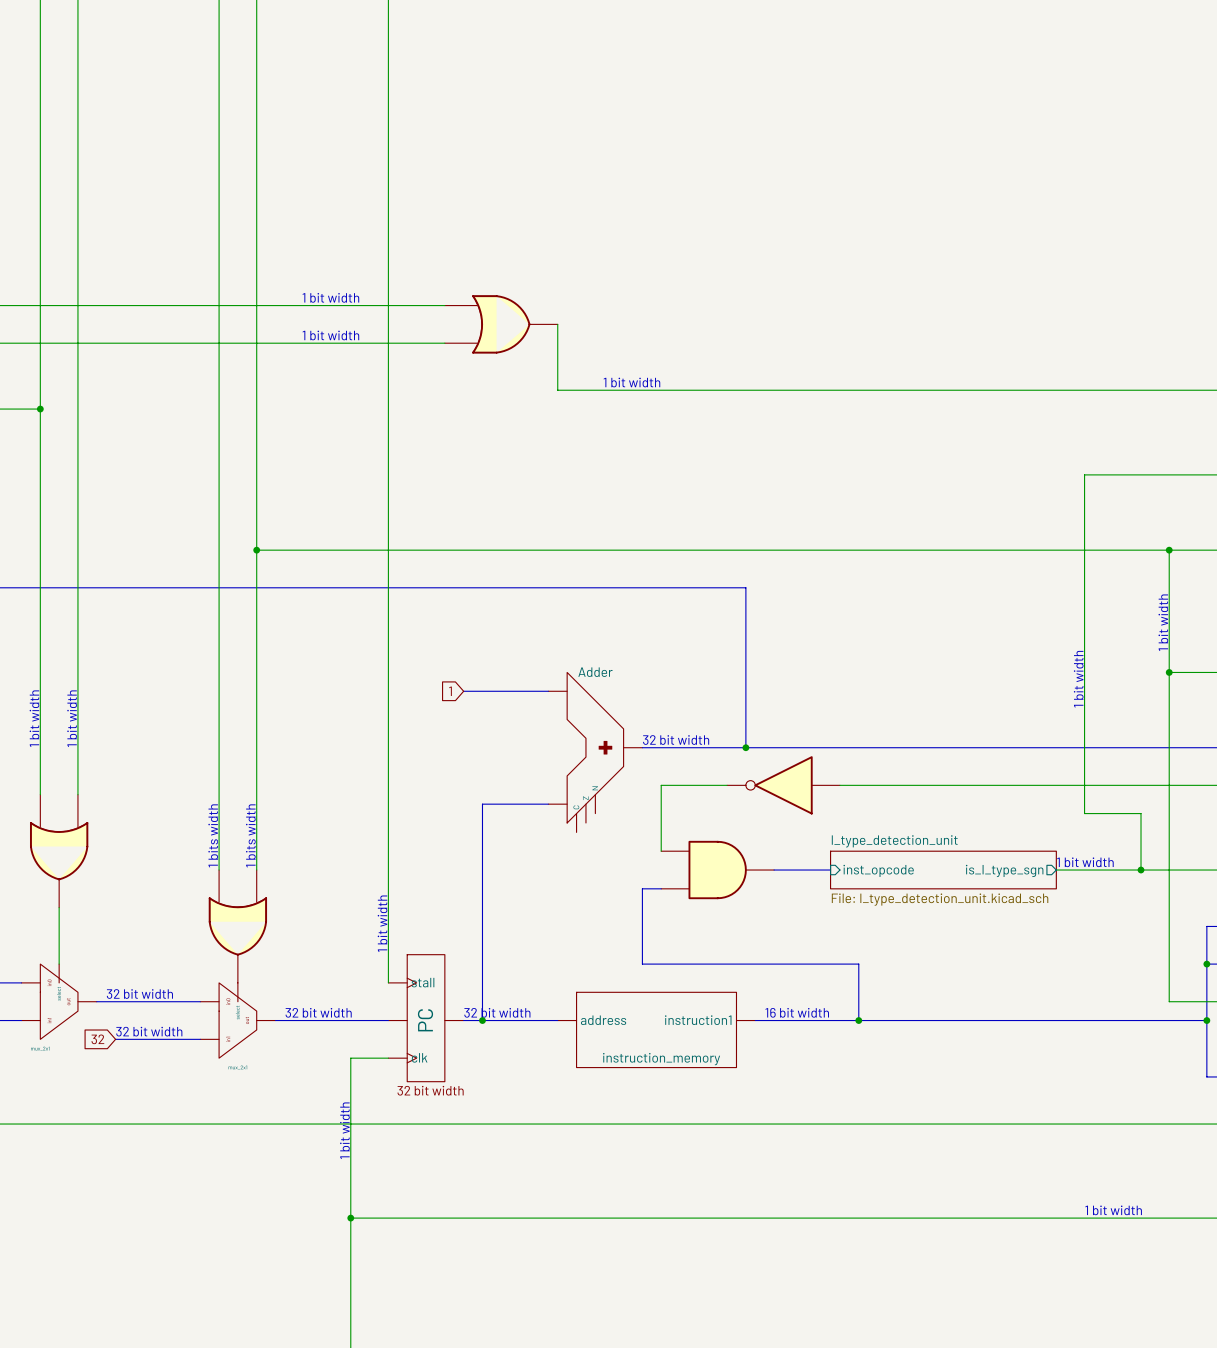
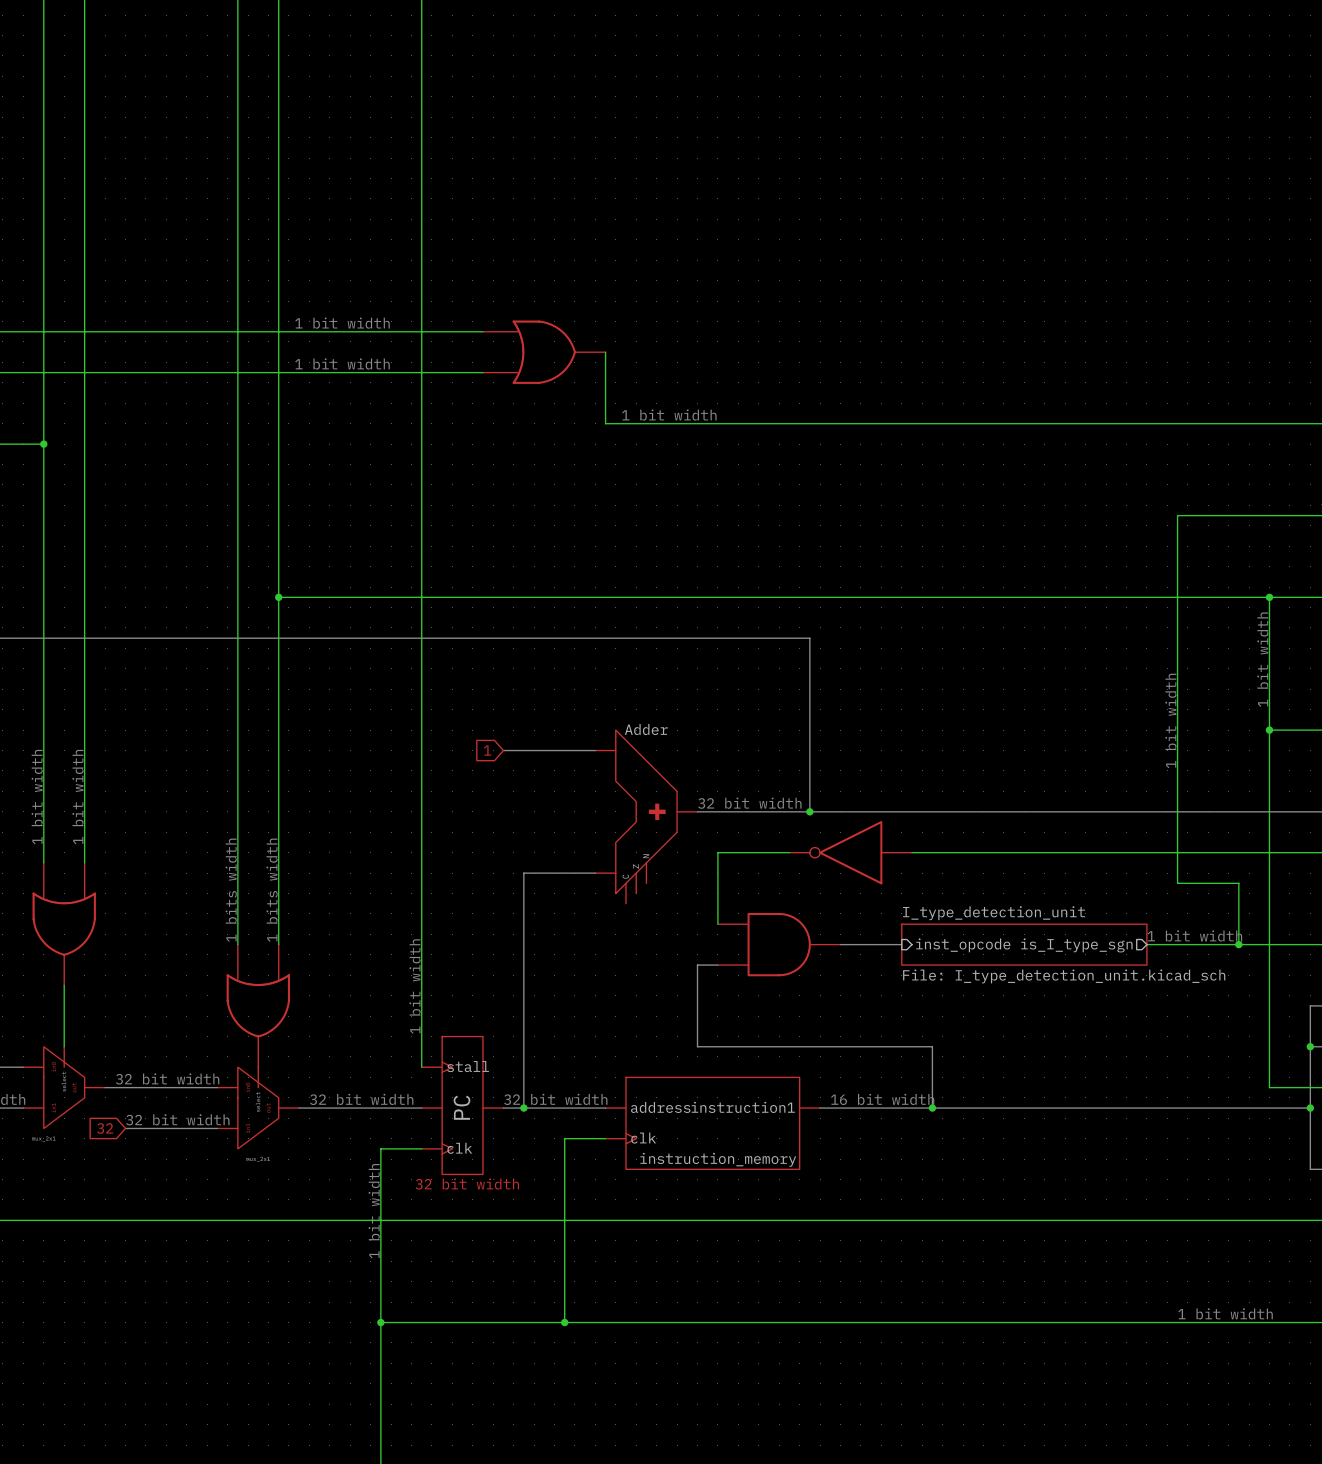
part symbol: [557, 992, 756, 1068] -> [605, 1077, 821, 1170]
wire: none -> (605, 1138) (564, 1138) (564, 1322)
junction: none -> (564, 1322)

